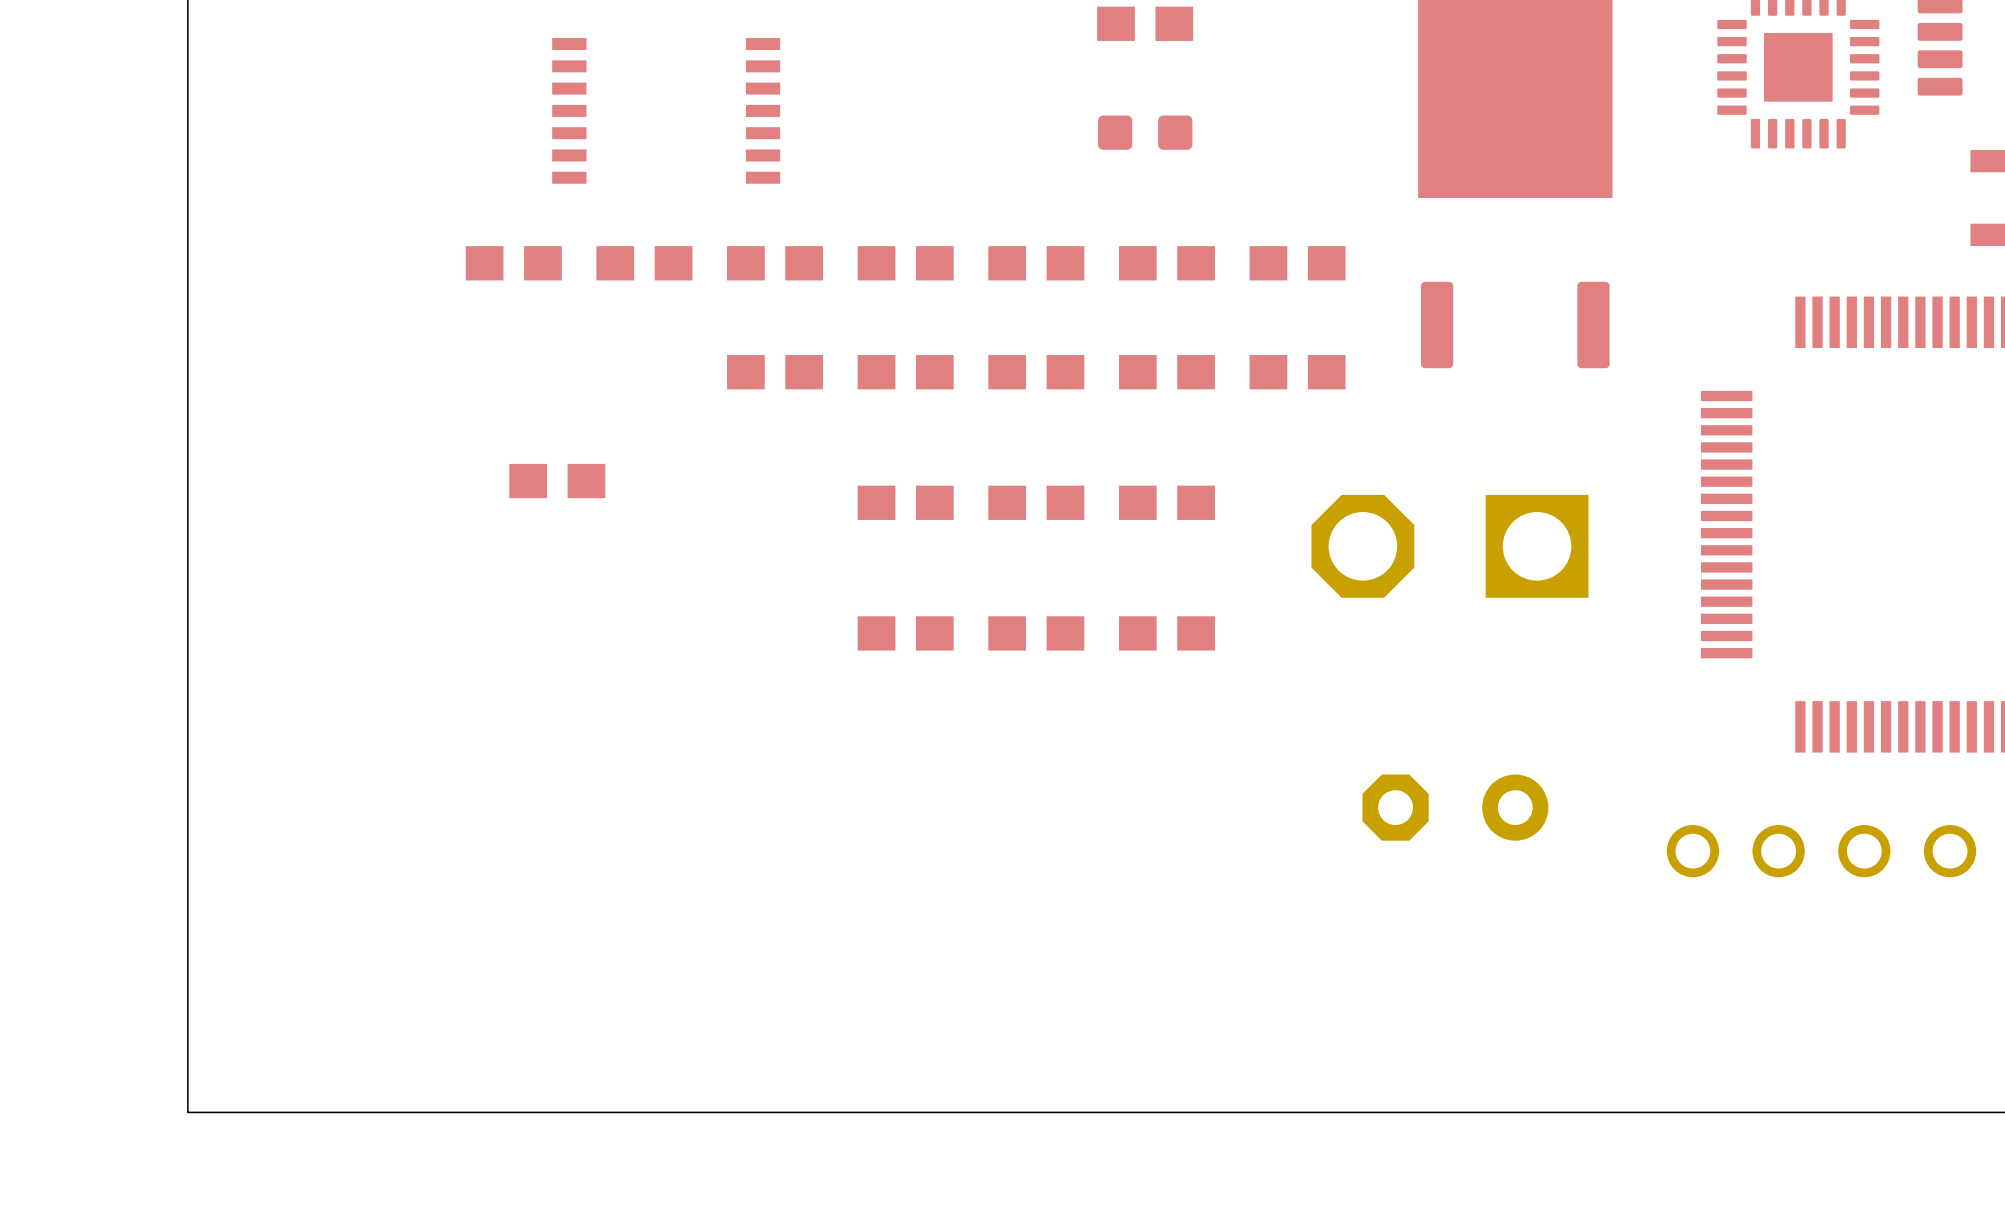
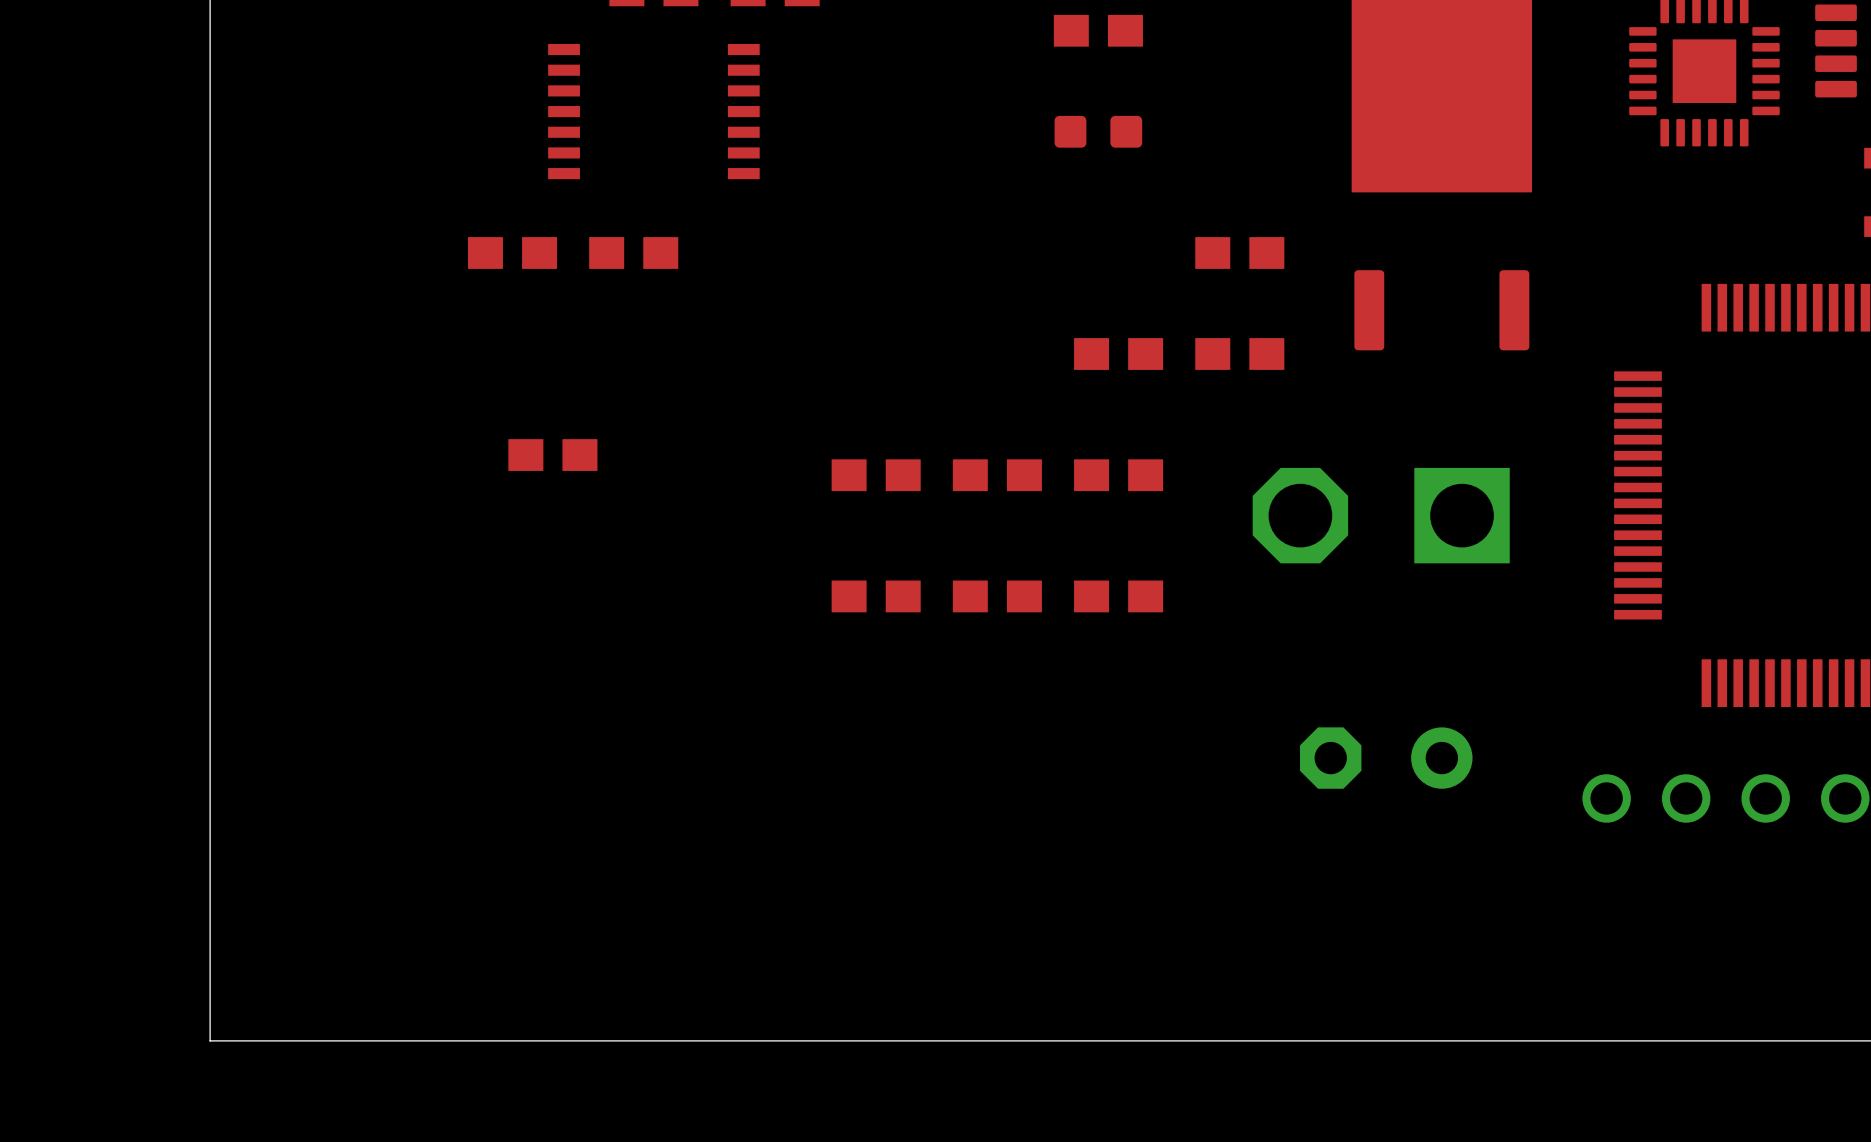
part: (775, 263) -> none
part: (905, 263) -> none
part: (1036, 263) -> none
part: (1166, 263) -> none
part: (775, 372) -> none
part: (905, 372) -> none
part: (1036, 372) -> none

